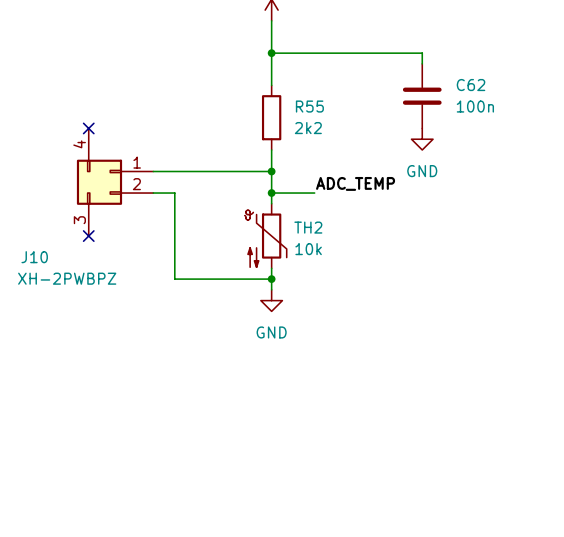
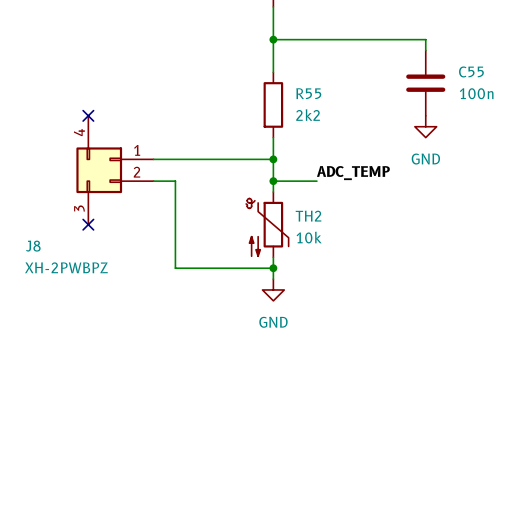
C62 name: C62 (471, 85) -> C55 (471, 71)
J10 name: J10 (34, 257) -> J8 (33, 246)

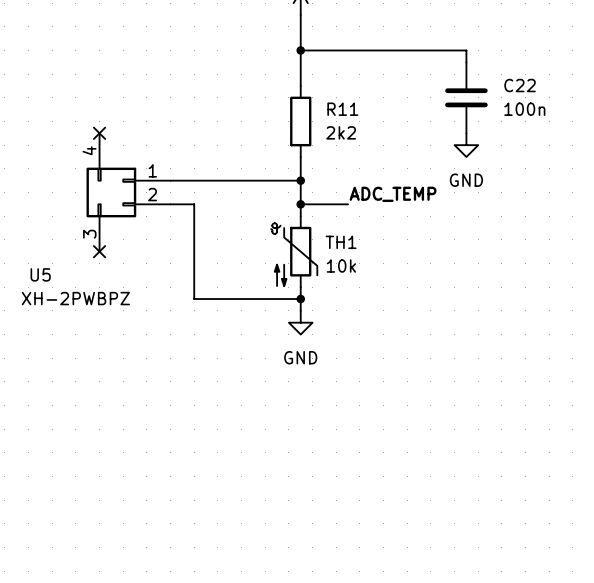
C55 name: C55 (471, 71) -> C22 (520, 85)
R55 name: R55 (308, 93) -> R11 (342, 109)
TH2 name: TH2 (308, 216) -> TH1 (341, 242)
J8 name: J8 (33, 246) -> U5 (40, 274)

